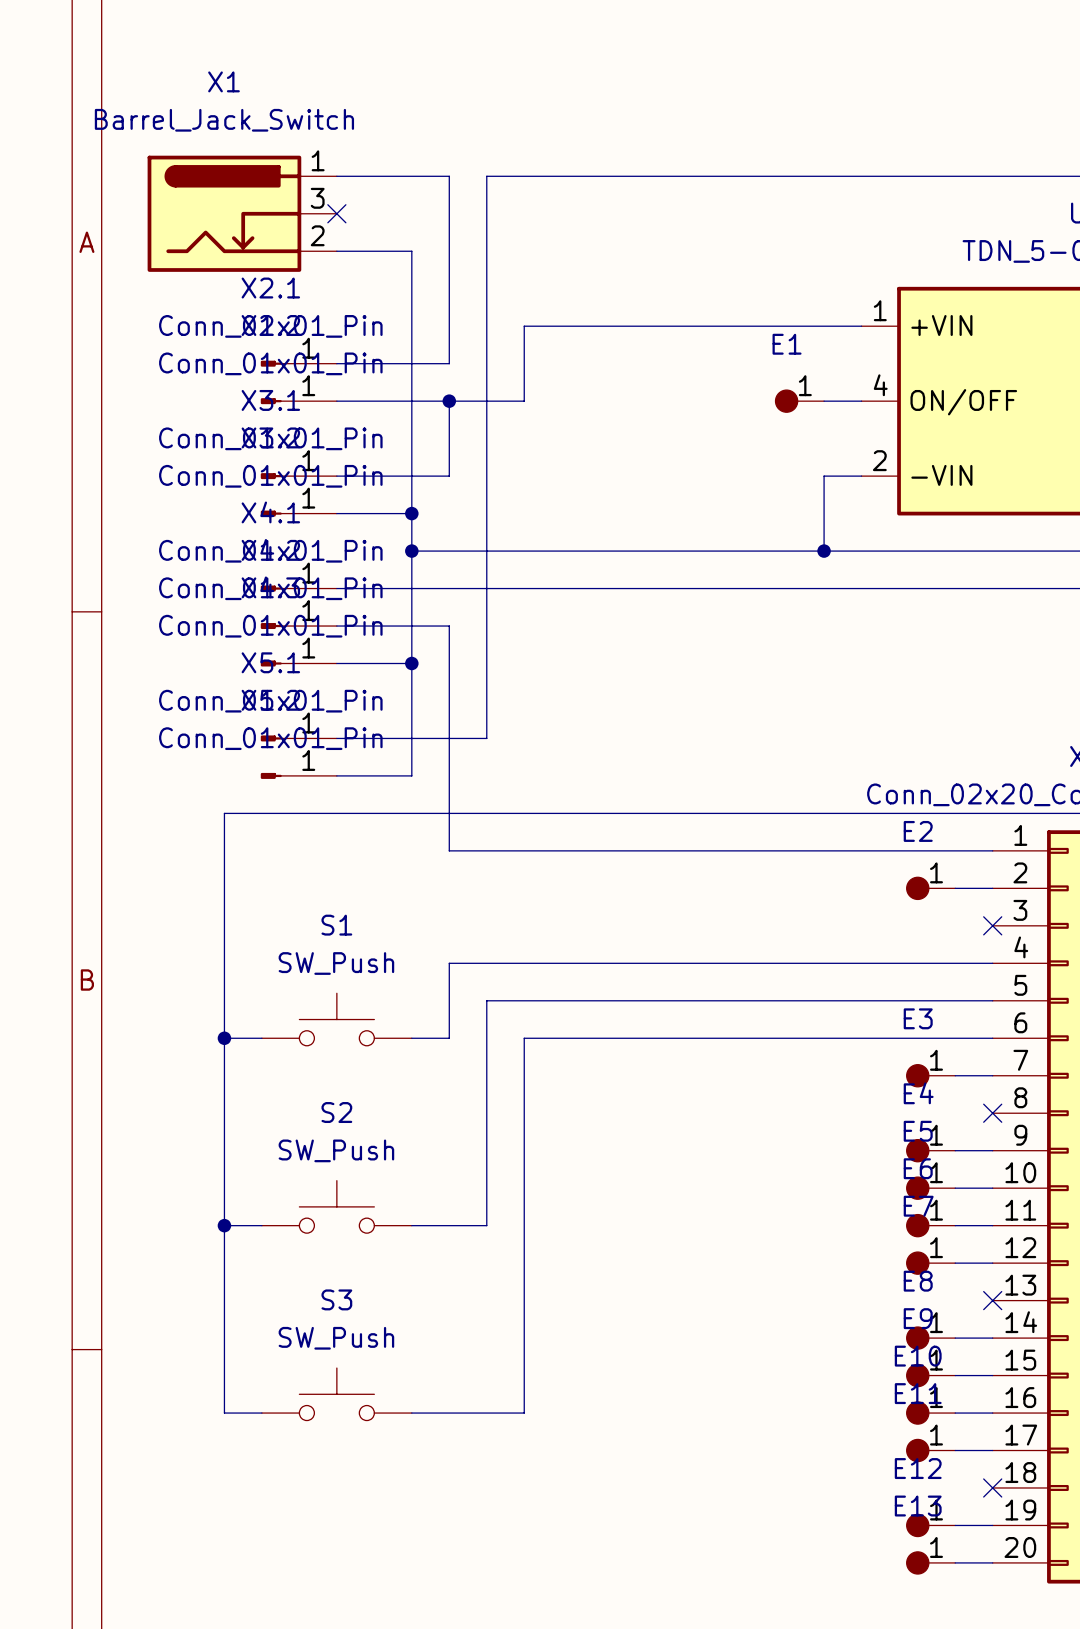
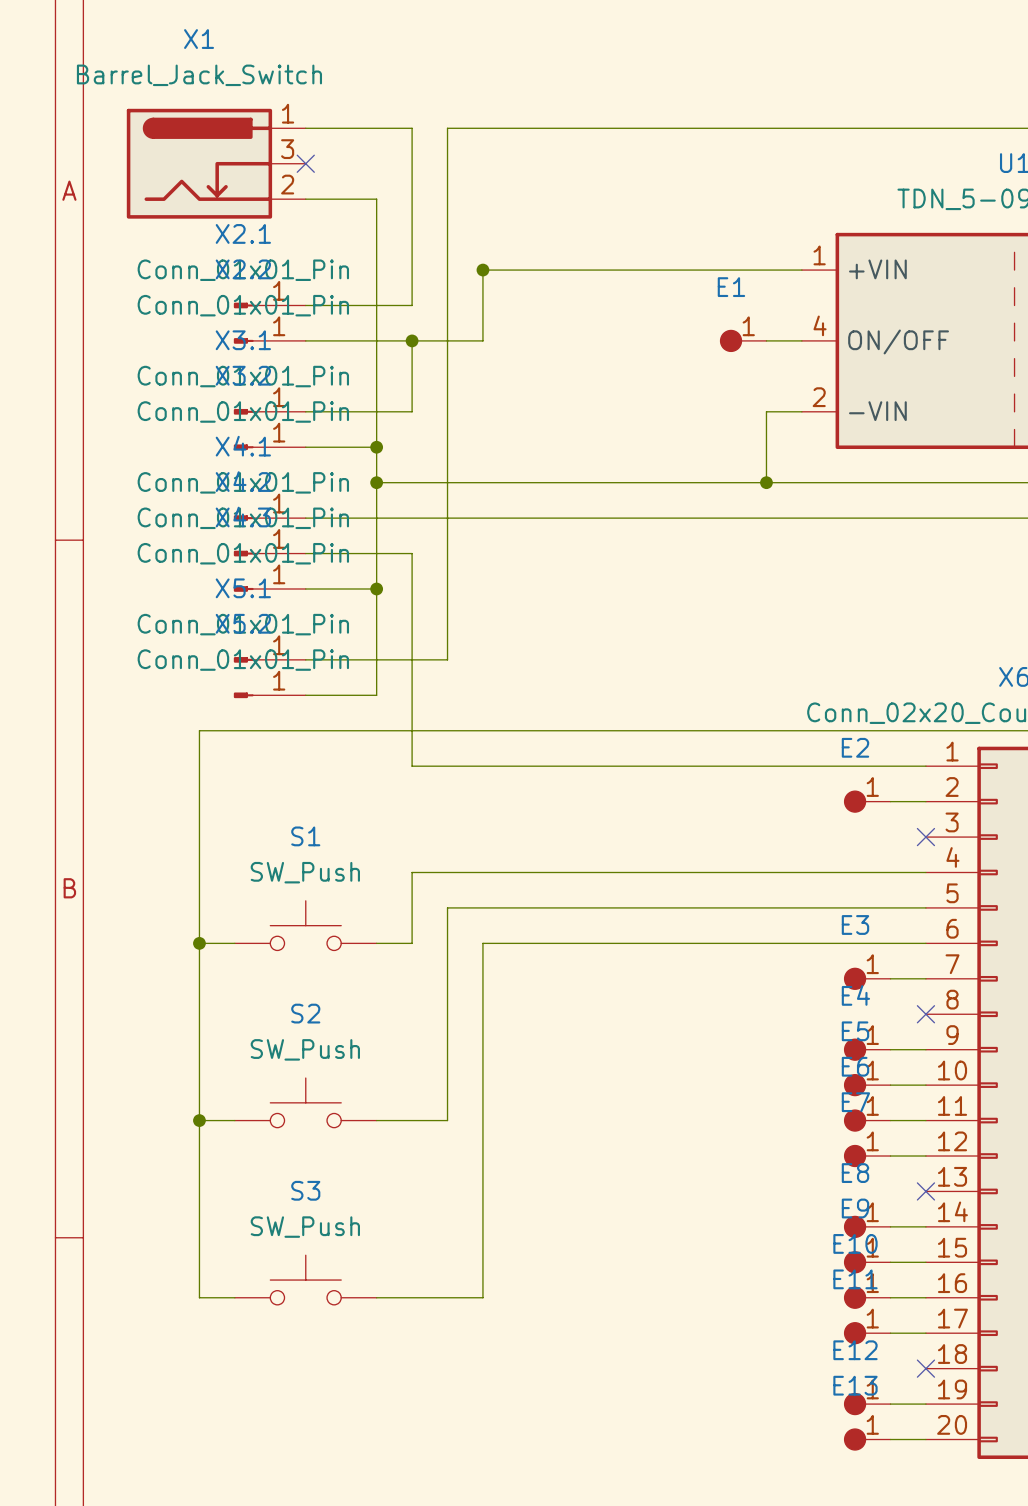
junction: none -> (482, 270)

